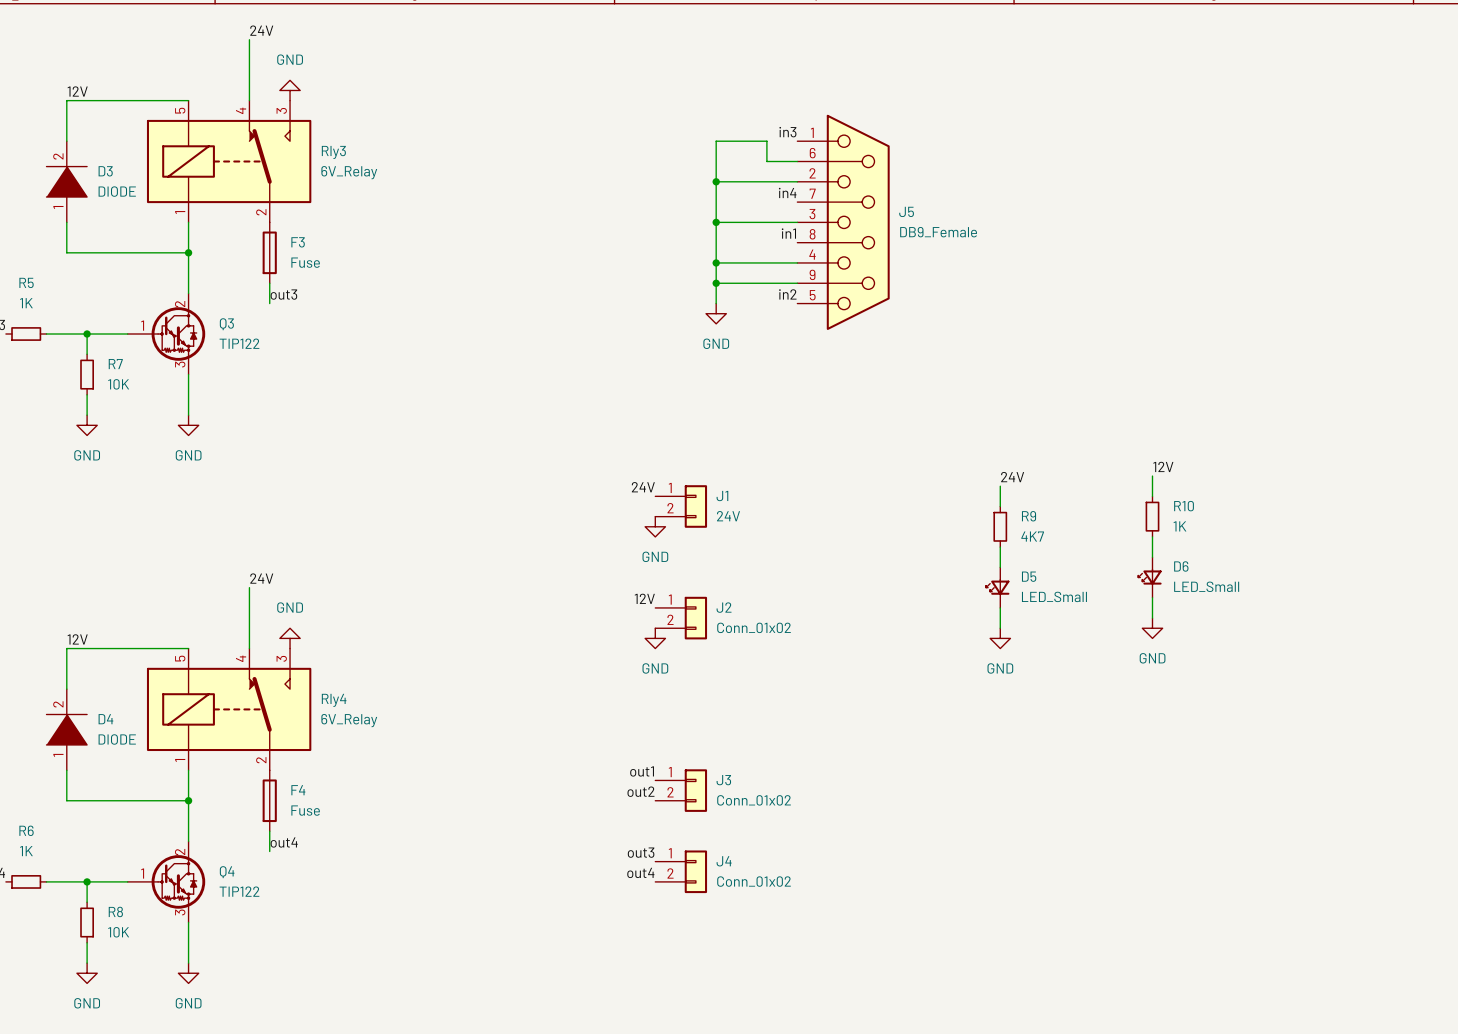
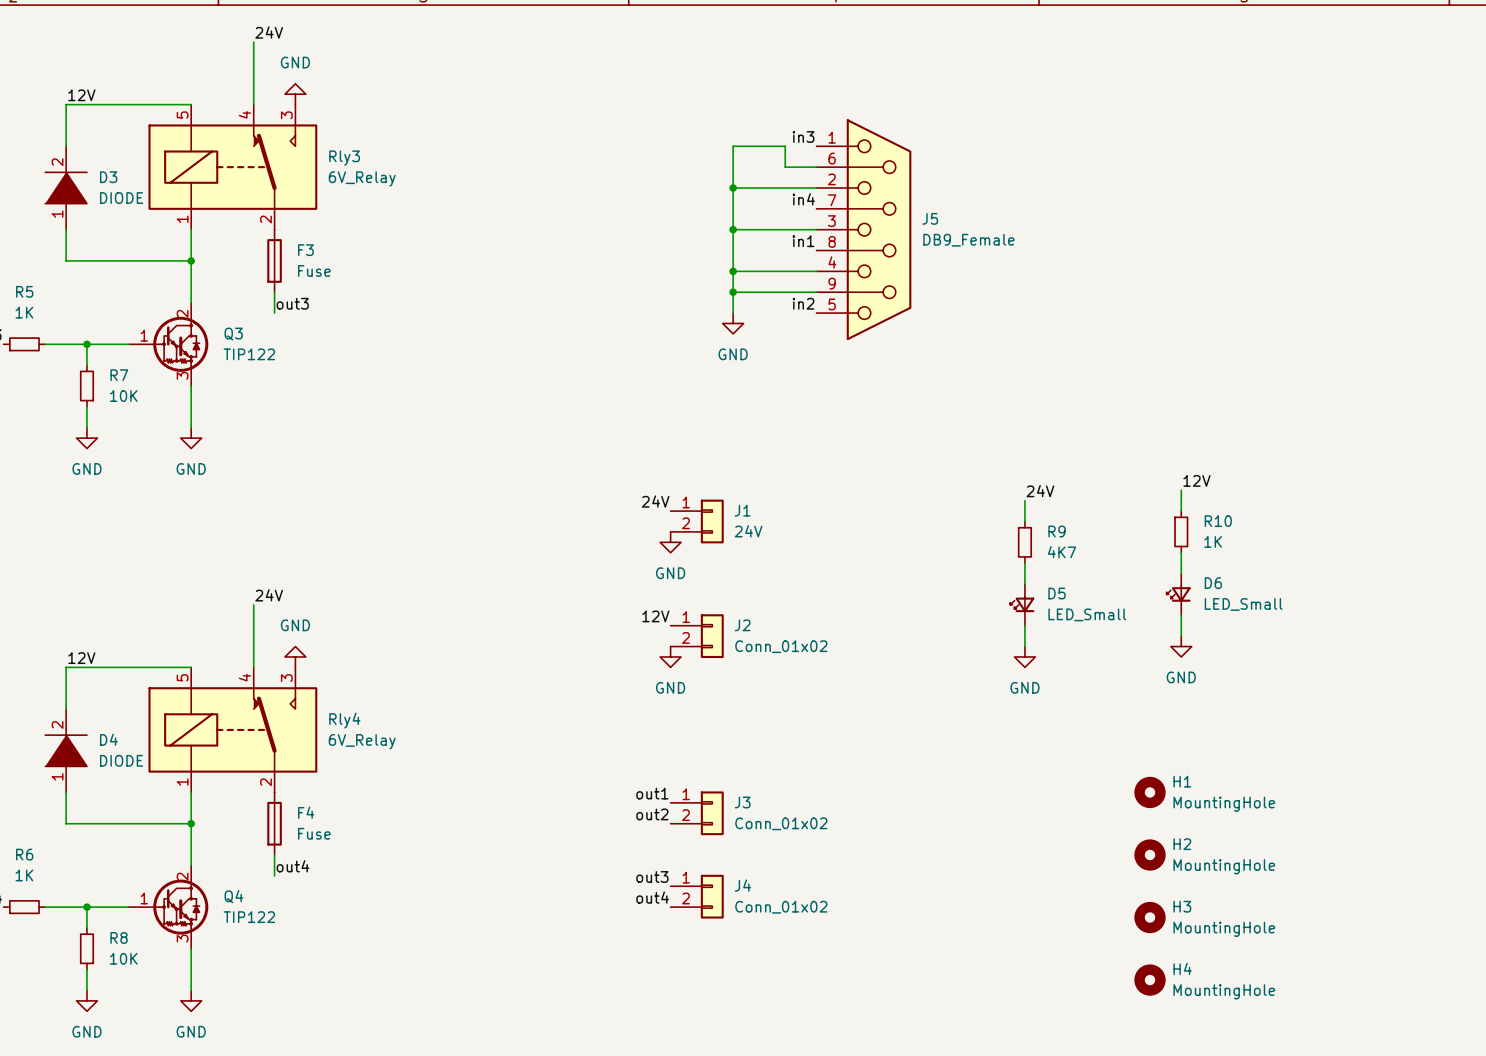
H1: none -> MountingHole (1150, 792)
H2: none -> MountingHole (1150, 854)
H3: none -> MountingHole (1150, 917)
H4: none -> MountingHole (1150, 980)

